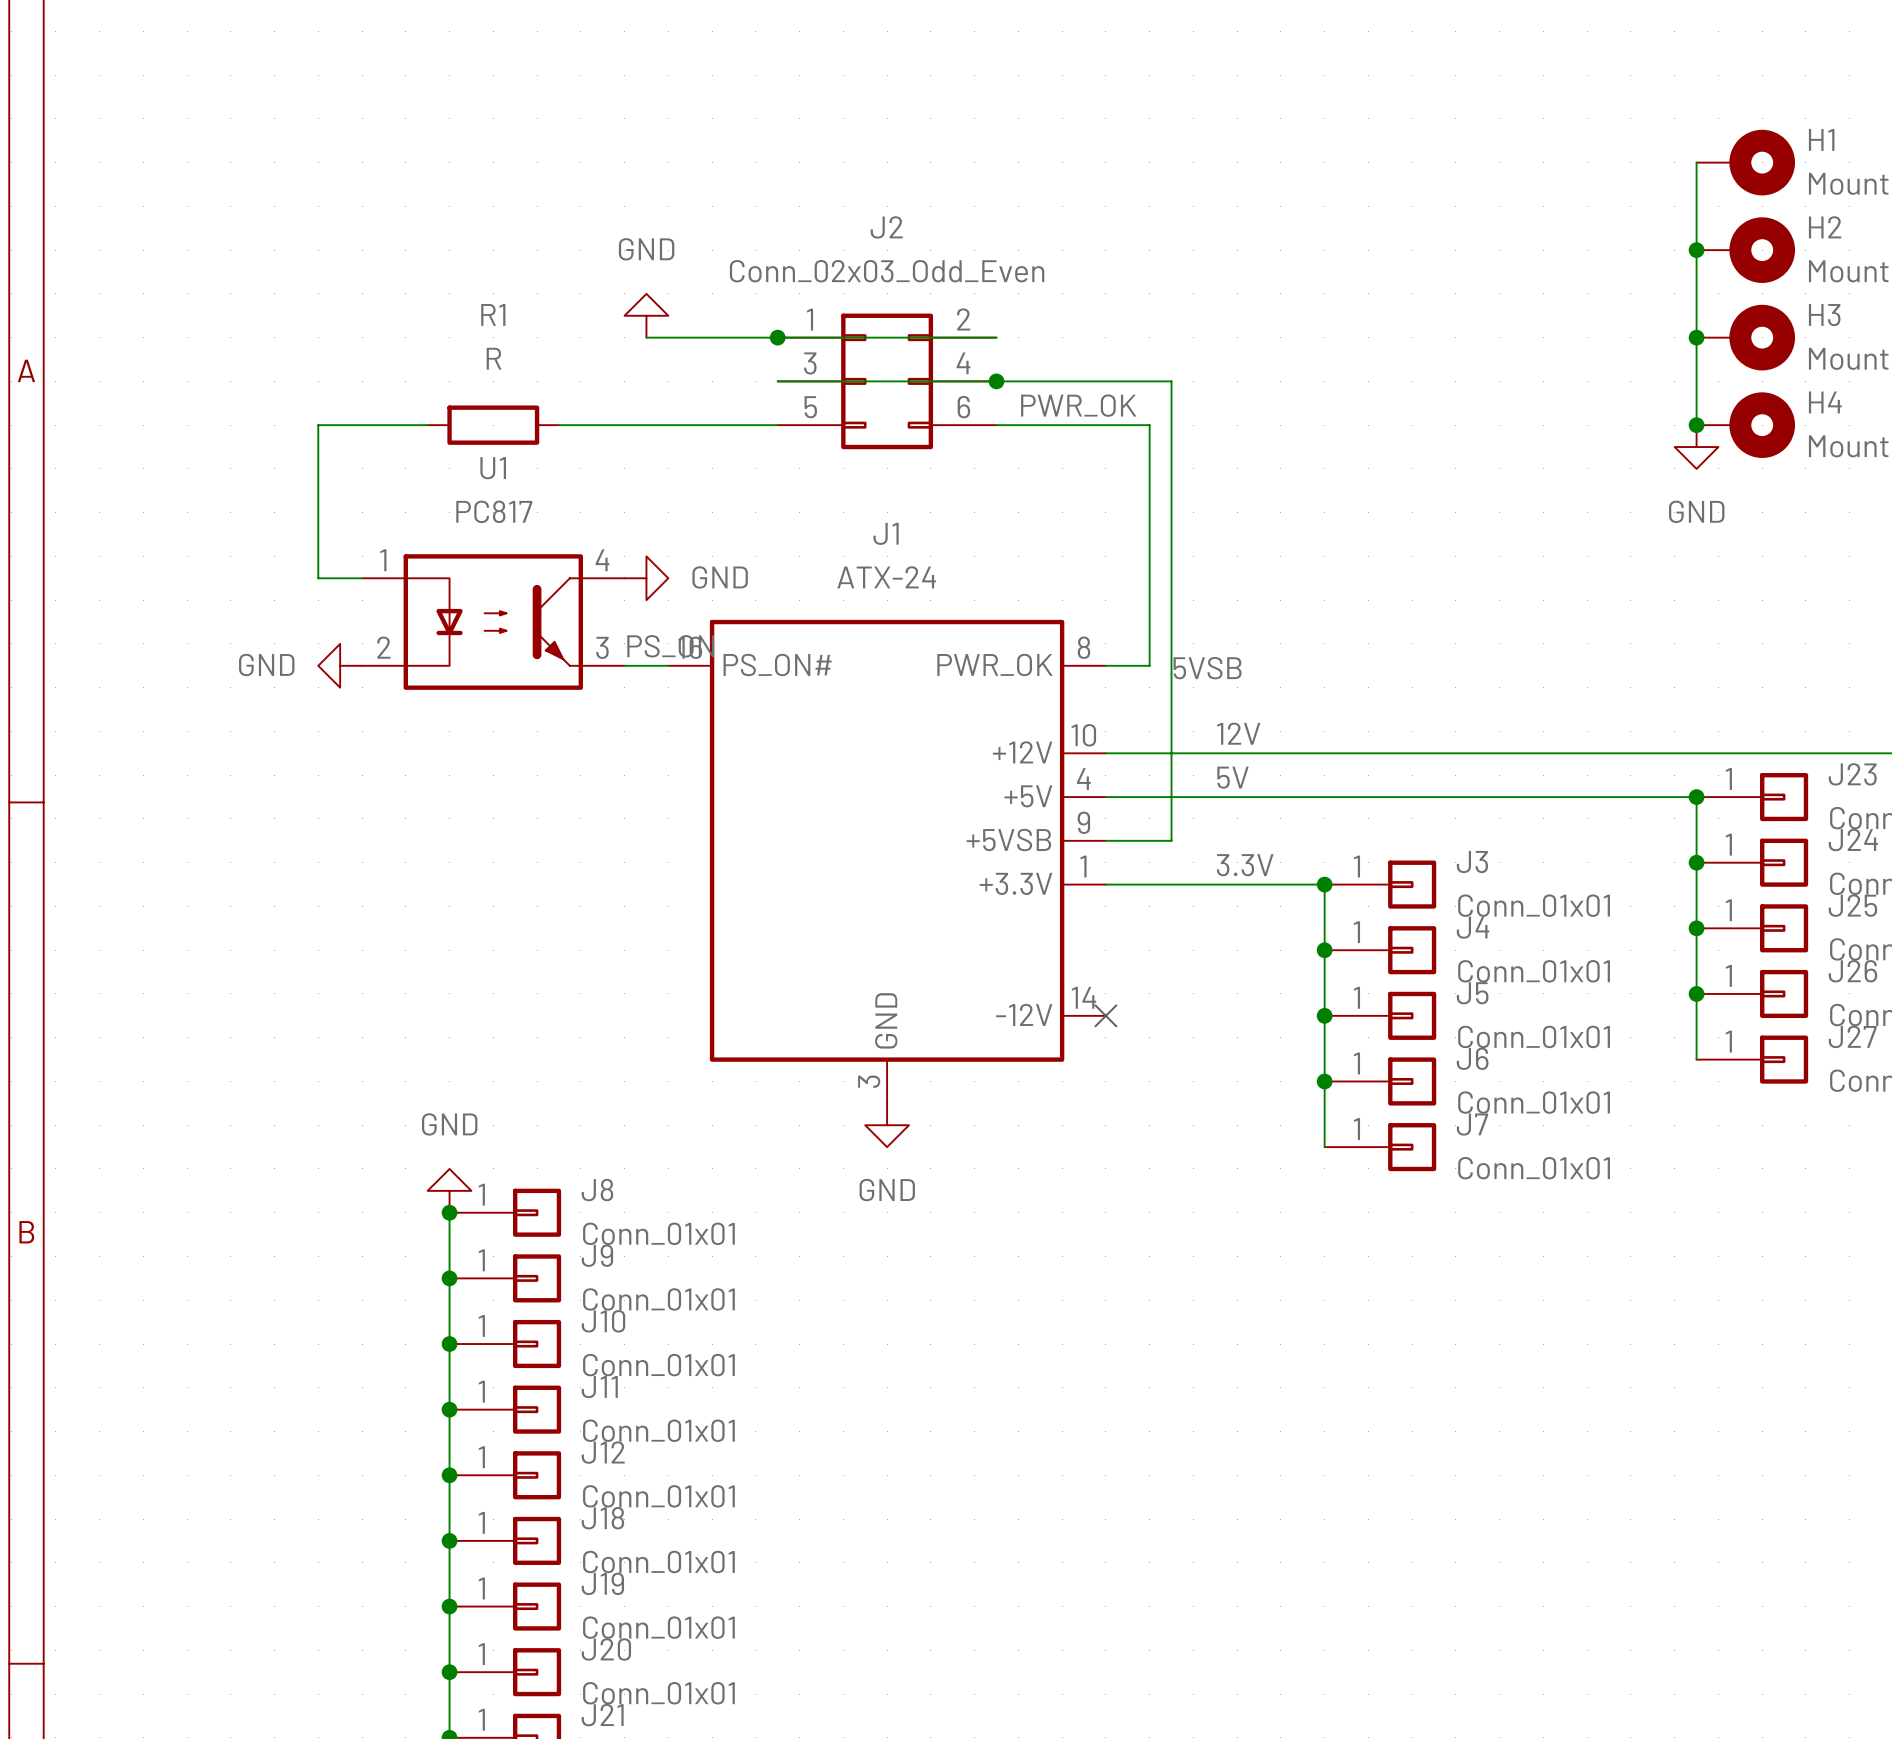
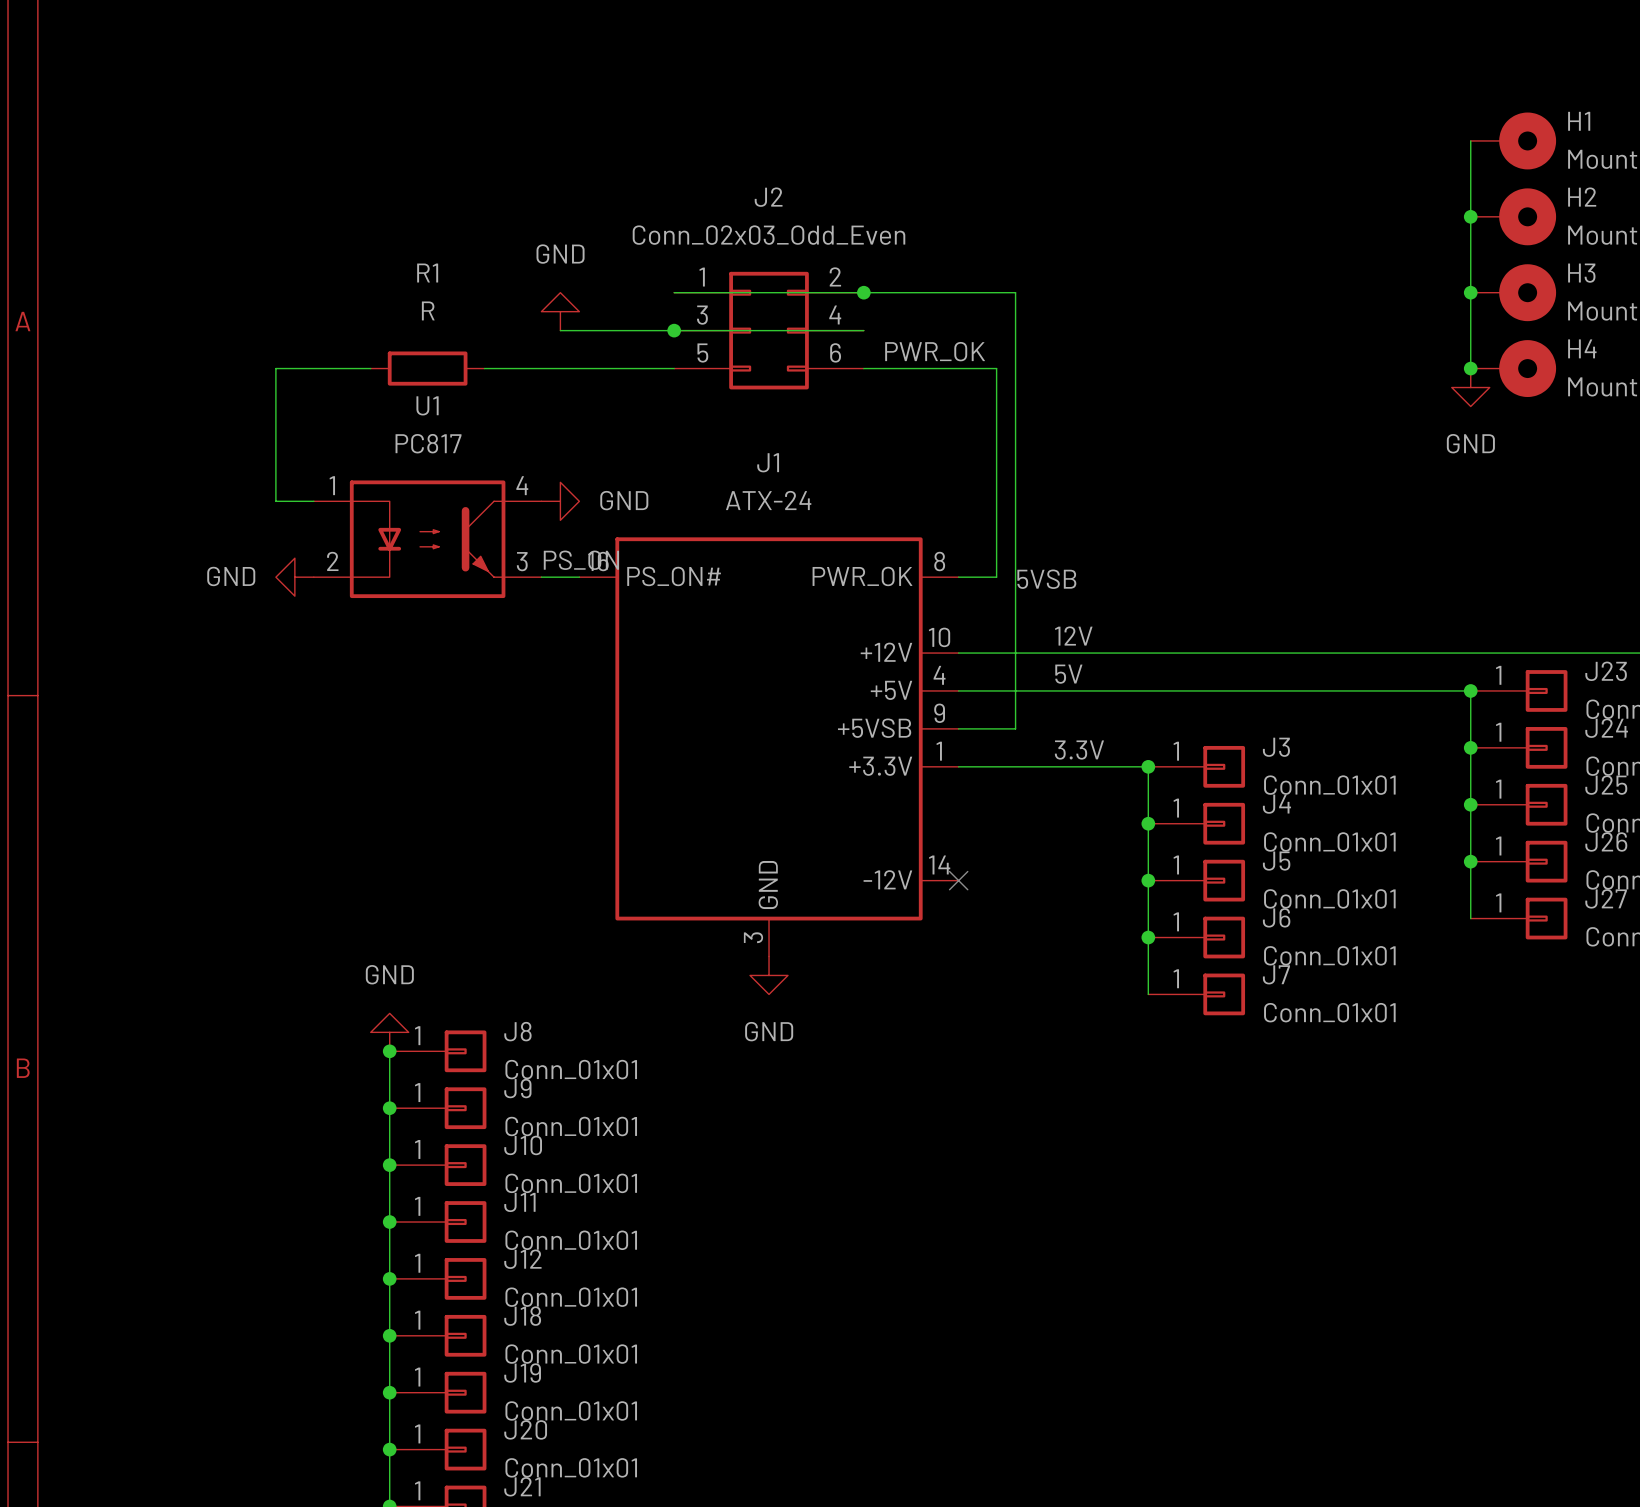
power symbol position: GND (646, 315) -> GND (560, 311)
wire: (646, 337) (777, 337) -> (560, 330) (674, 330)
junction position: (777, 337) -> (674, 330)
wire: (996, 381) (1171, 381) -> (863, 292) (1015, 292) (1015, 330)
junction position: (996, 381) -> (863, 292)

